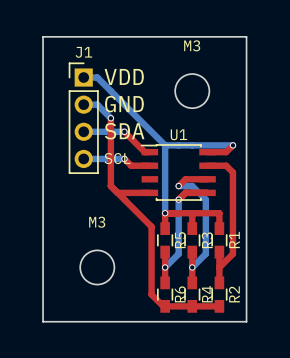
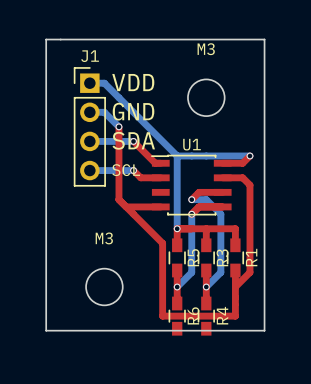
top track: (151, 294) (163, 306) (219, 306) -> (162, 316) (235, 316) (235, 305)
R2: (219, 294) -> none
board edge: (43, 308) (43, 321) (246, 321) (246, 308) -> (46, 330) (264, 330)

